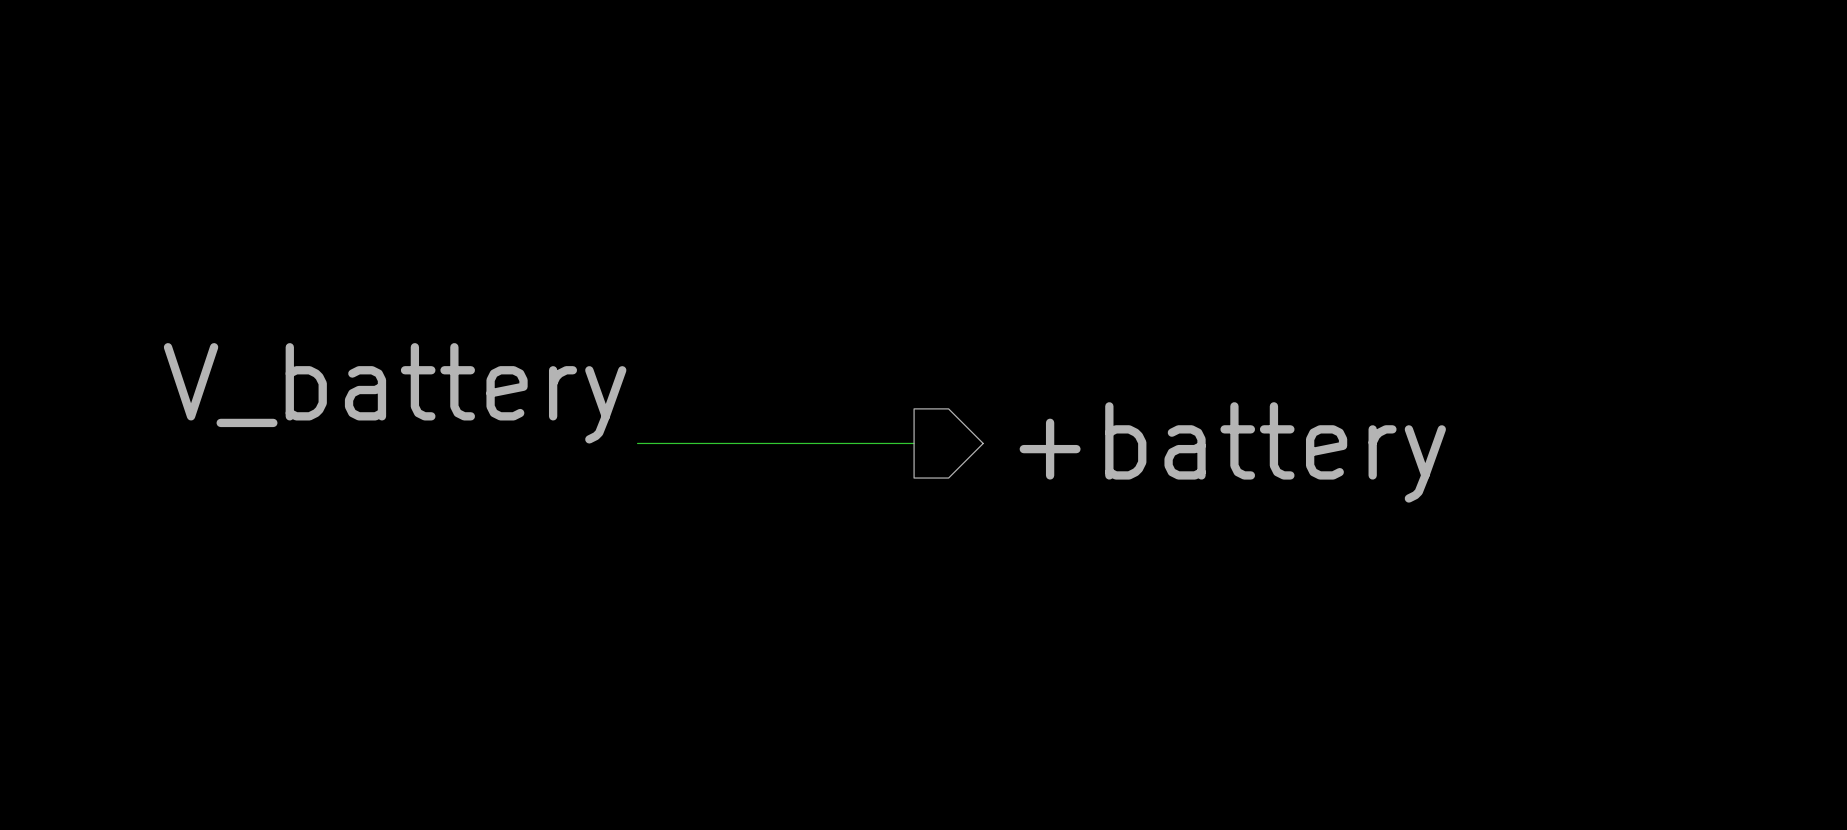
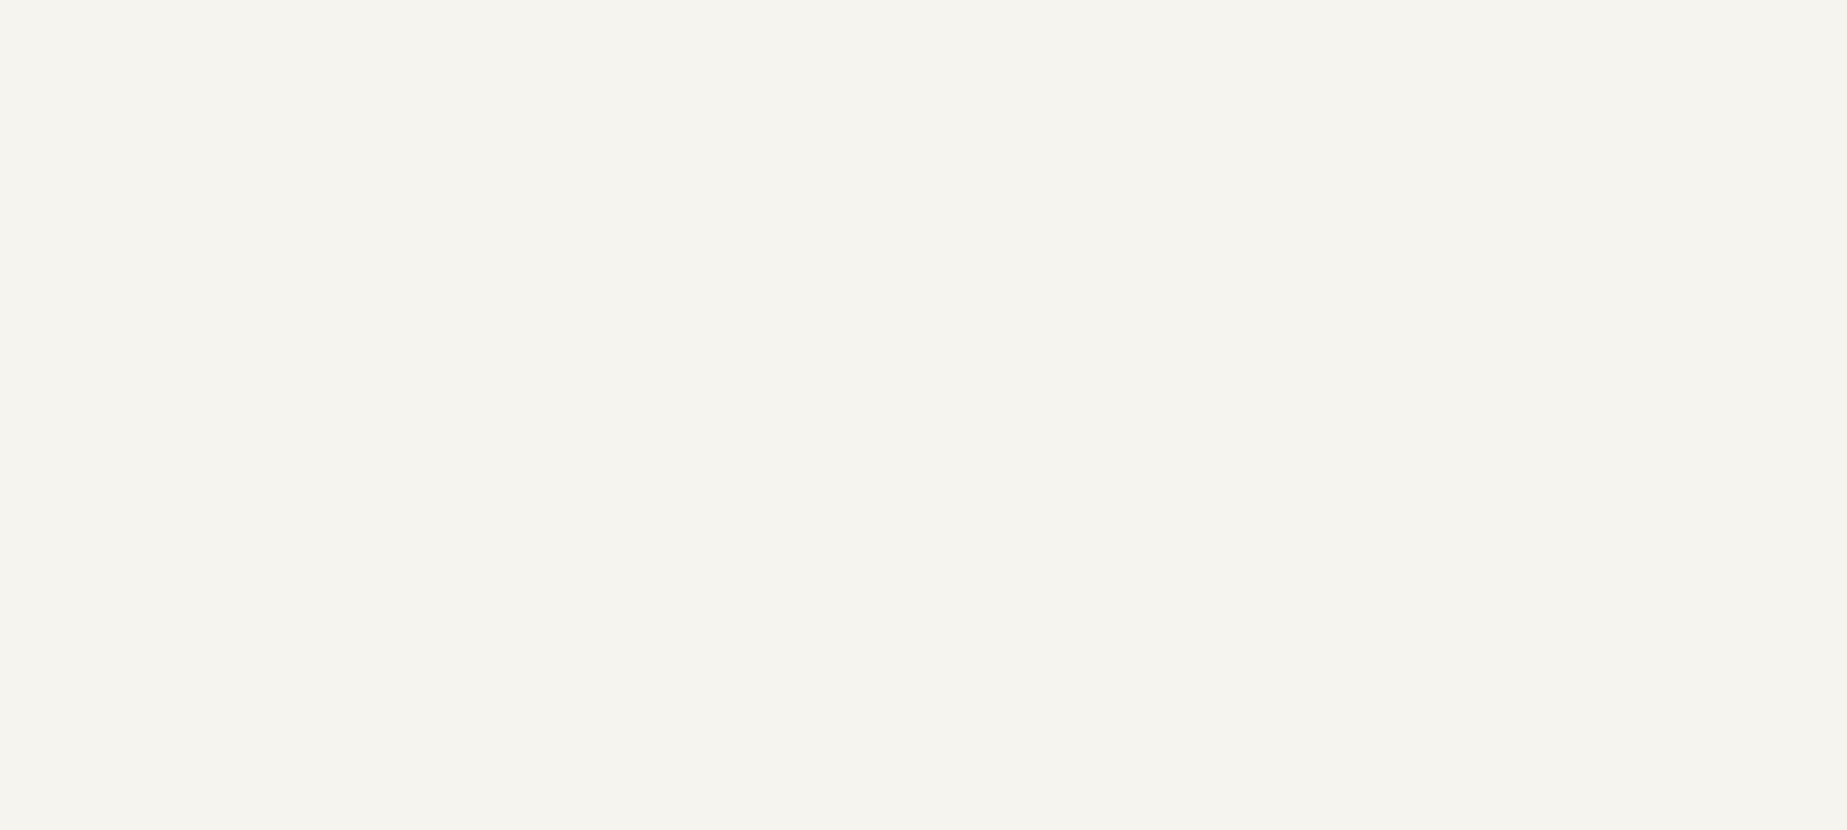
label: V_battery (395, 393) -> none
wire: (637, 443) (914, 443) -> none
hierarchical label: +battery (1232, 452) -> none

